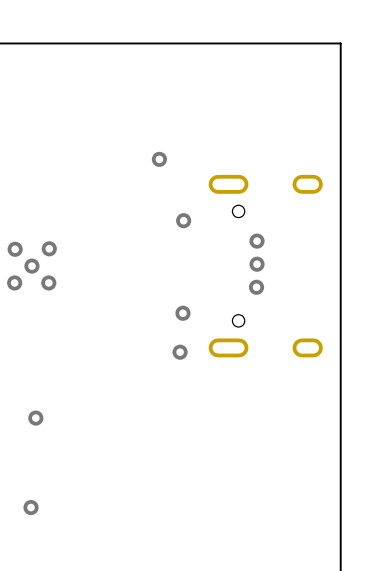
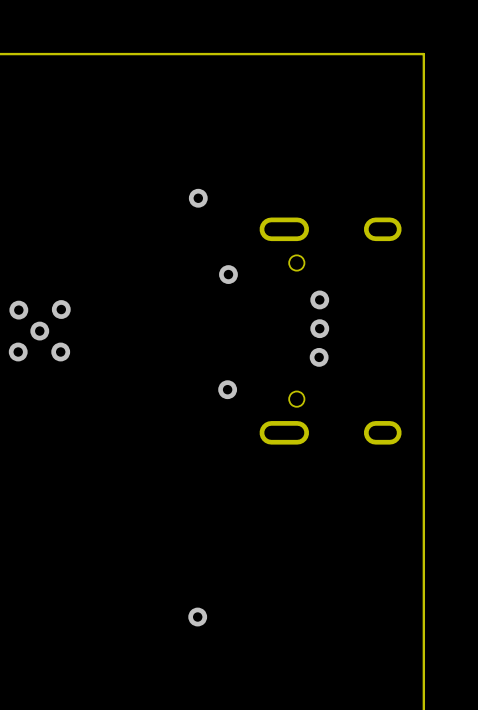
via: (180, 352) -> none
via: (35, 418) -> none
via: none -> (197, 617)
via: (31, 507) -> none

